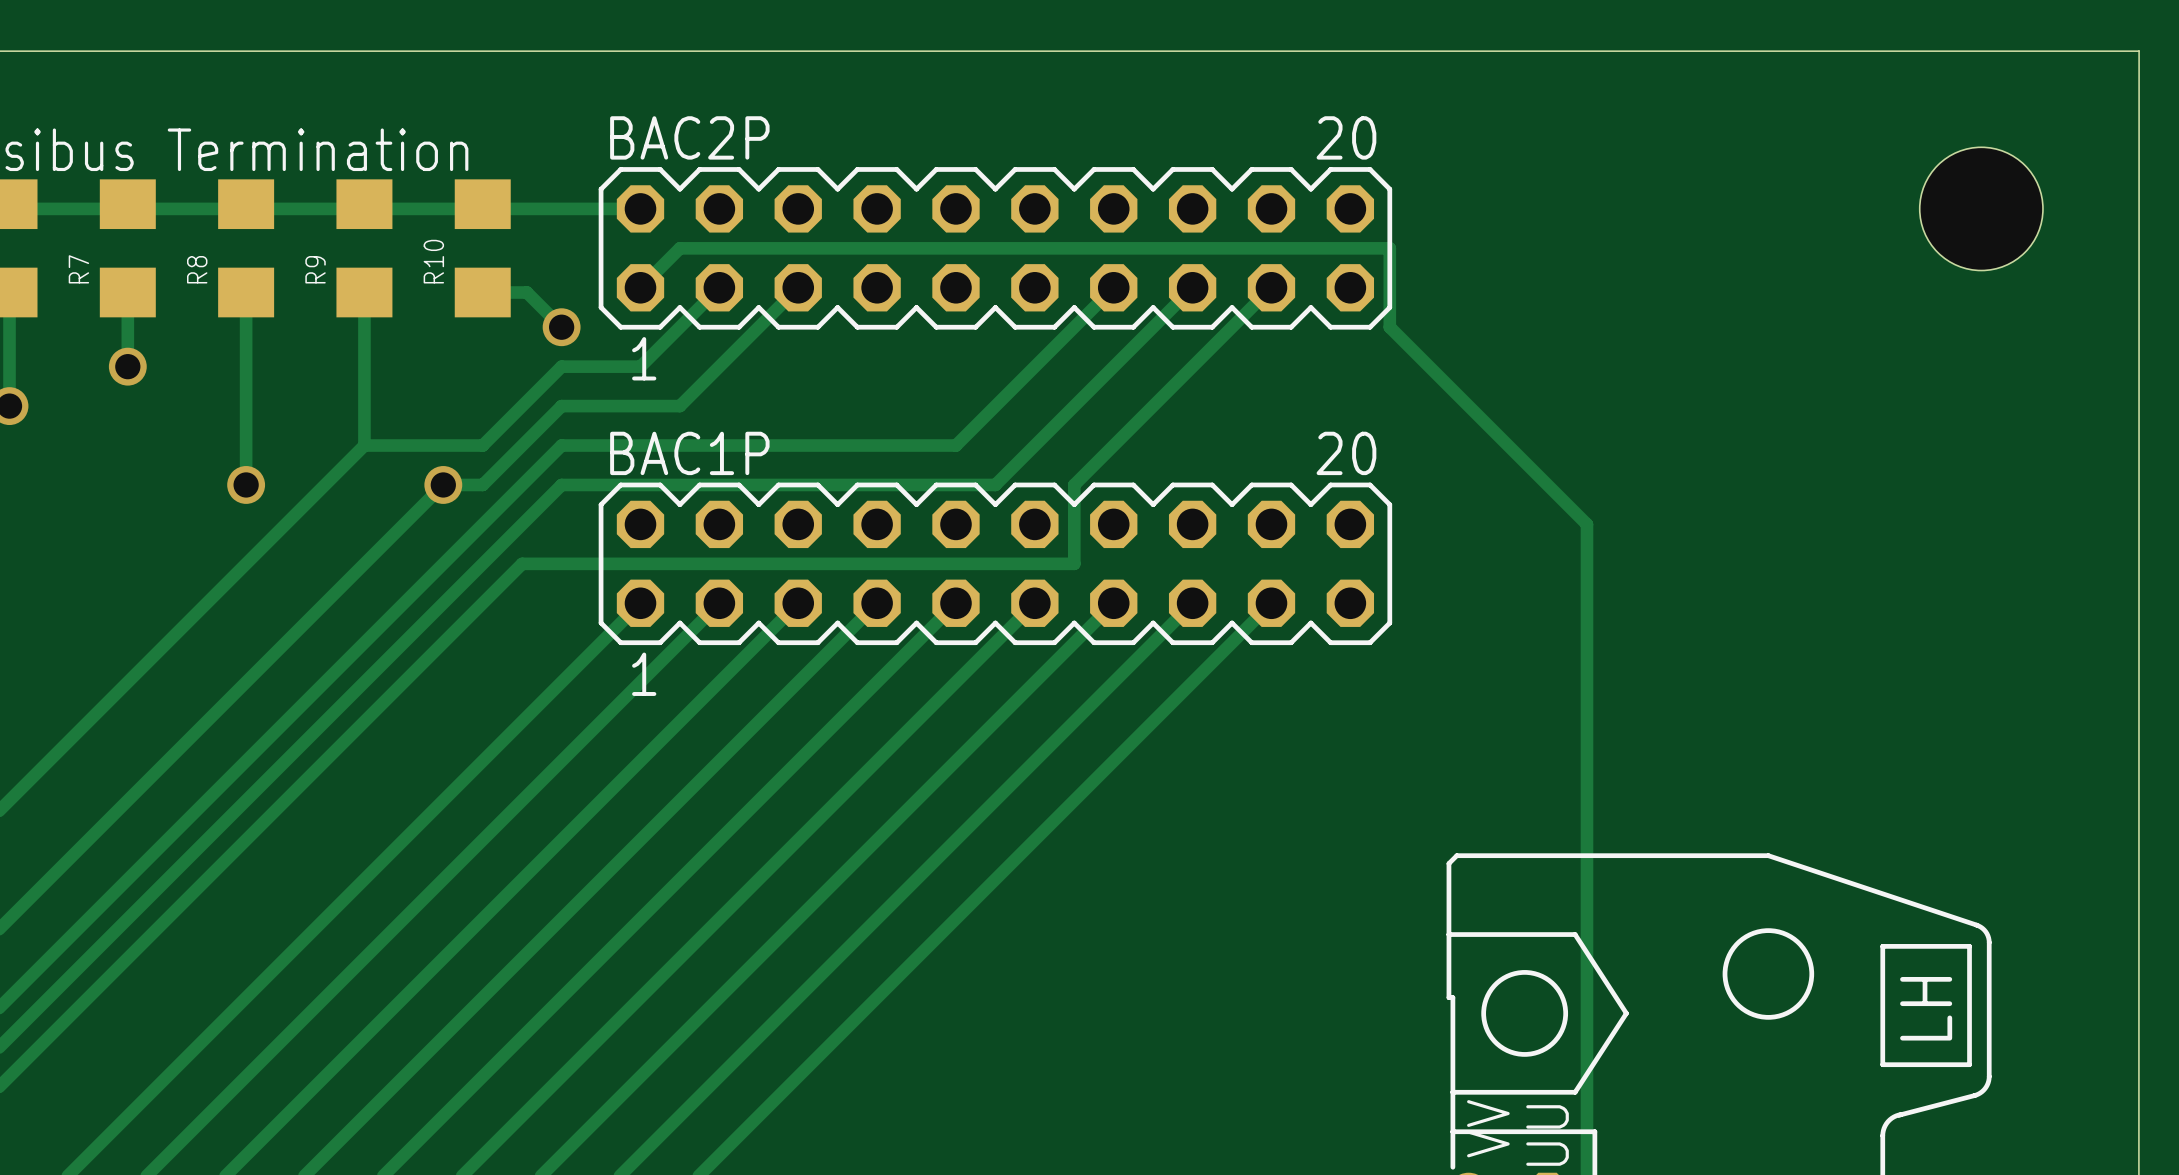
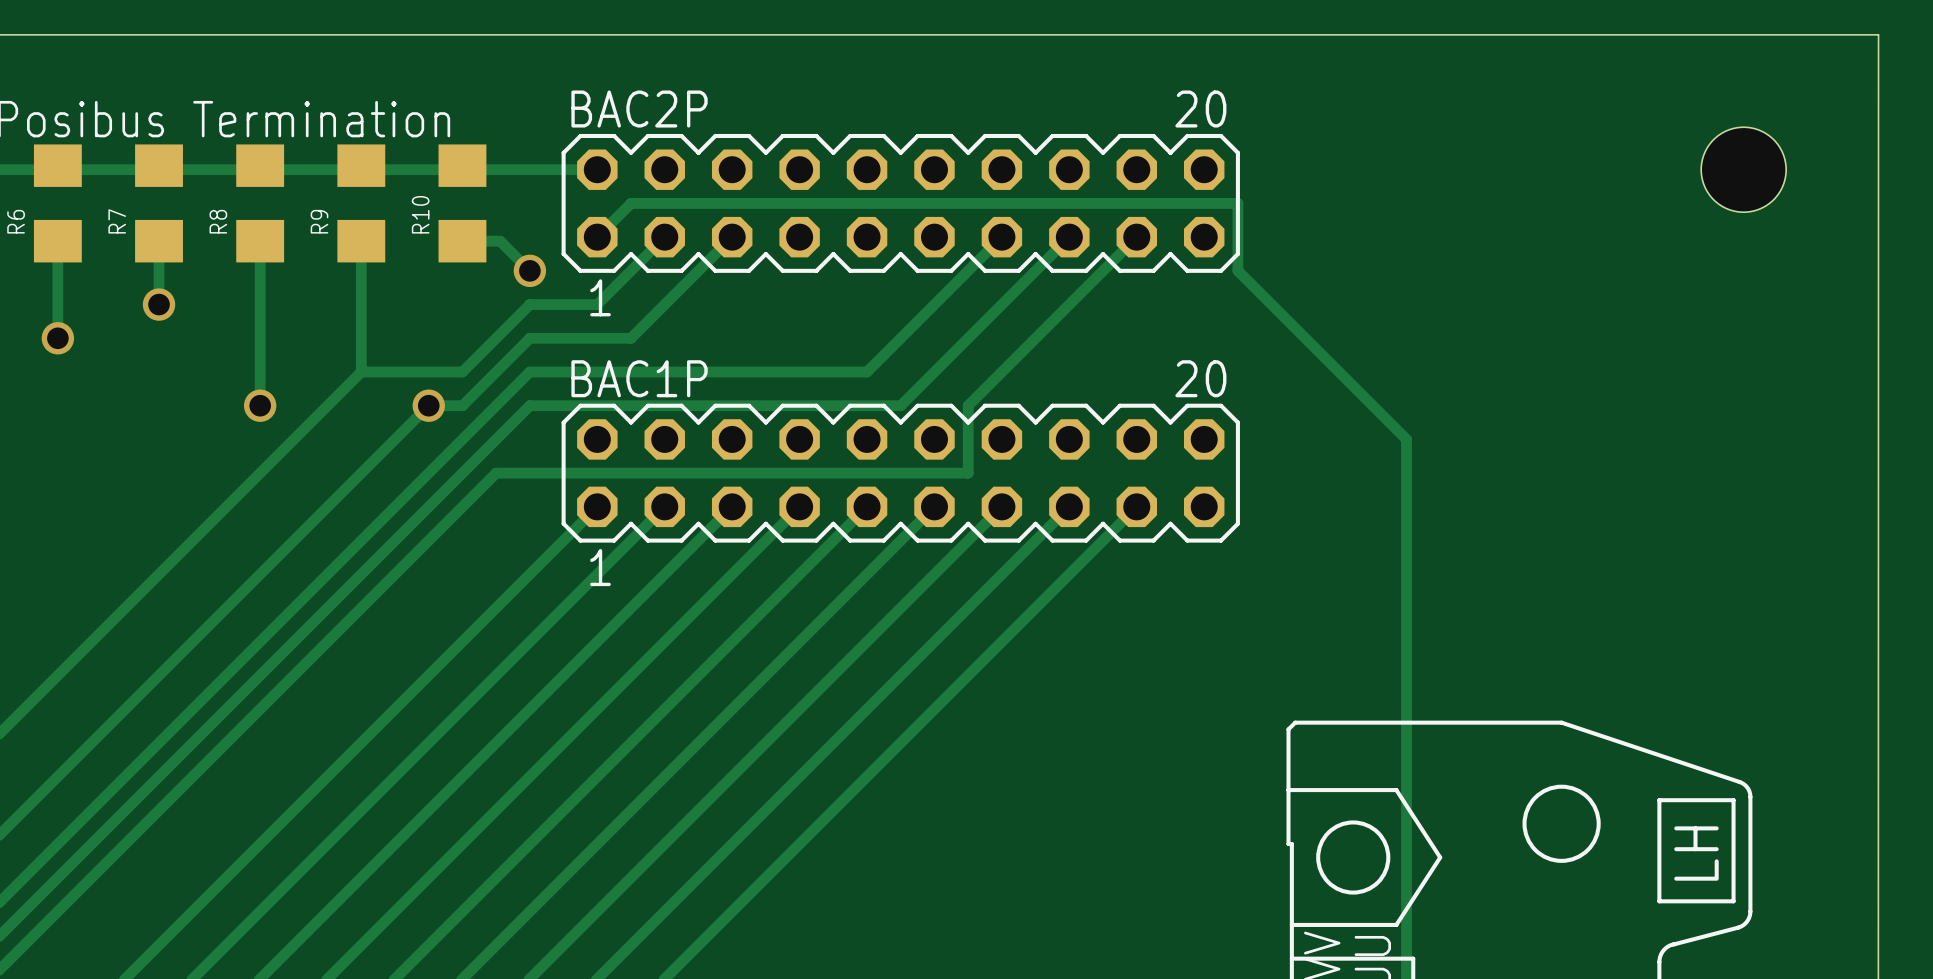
hole size: [1919, 147, 2043, 271] -> [1701, 127, 1787, 213]

